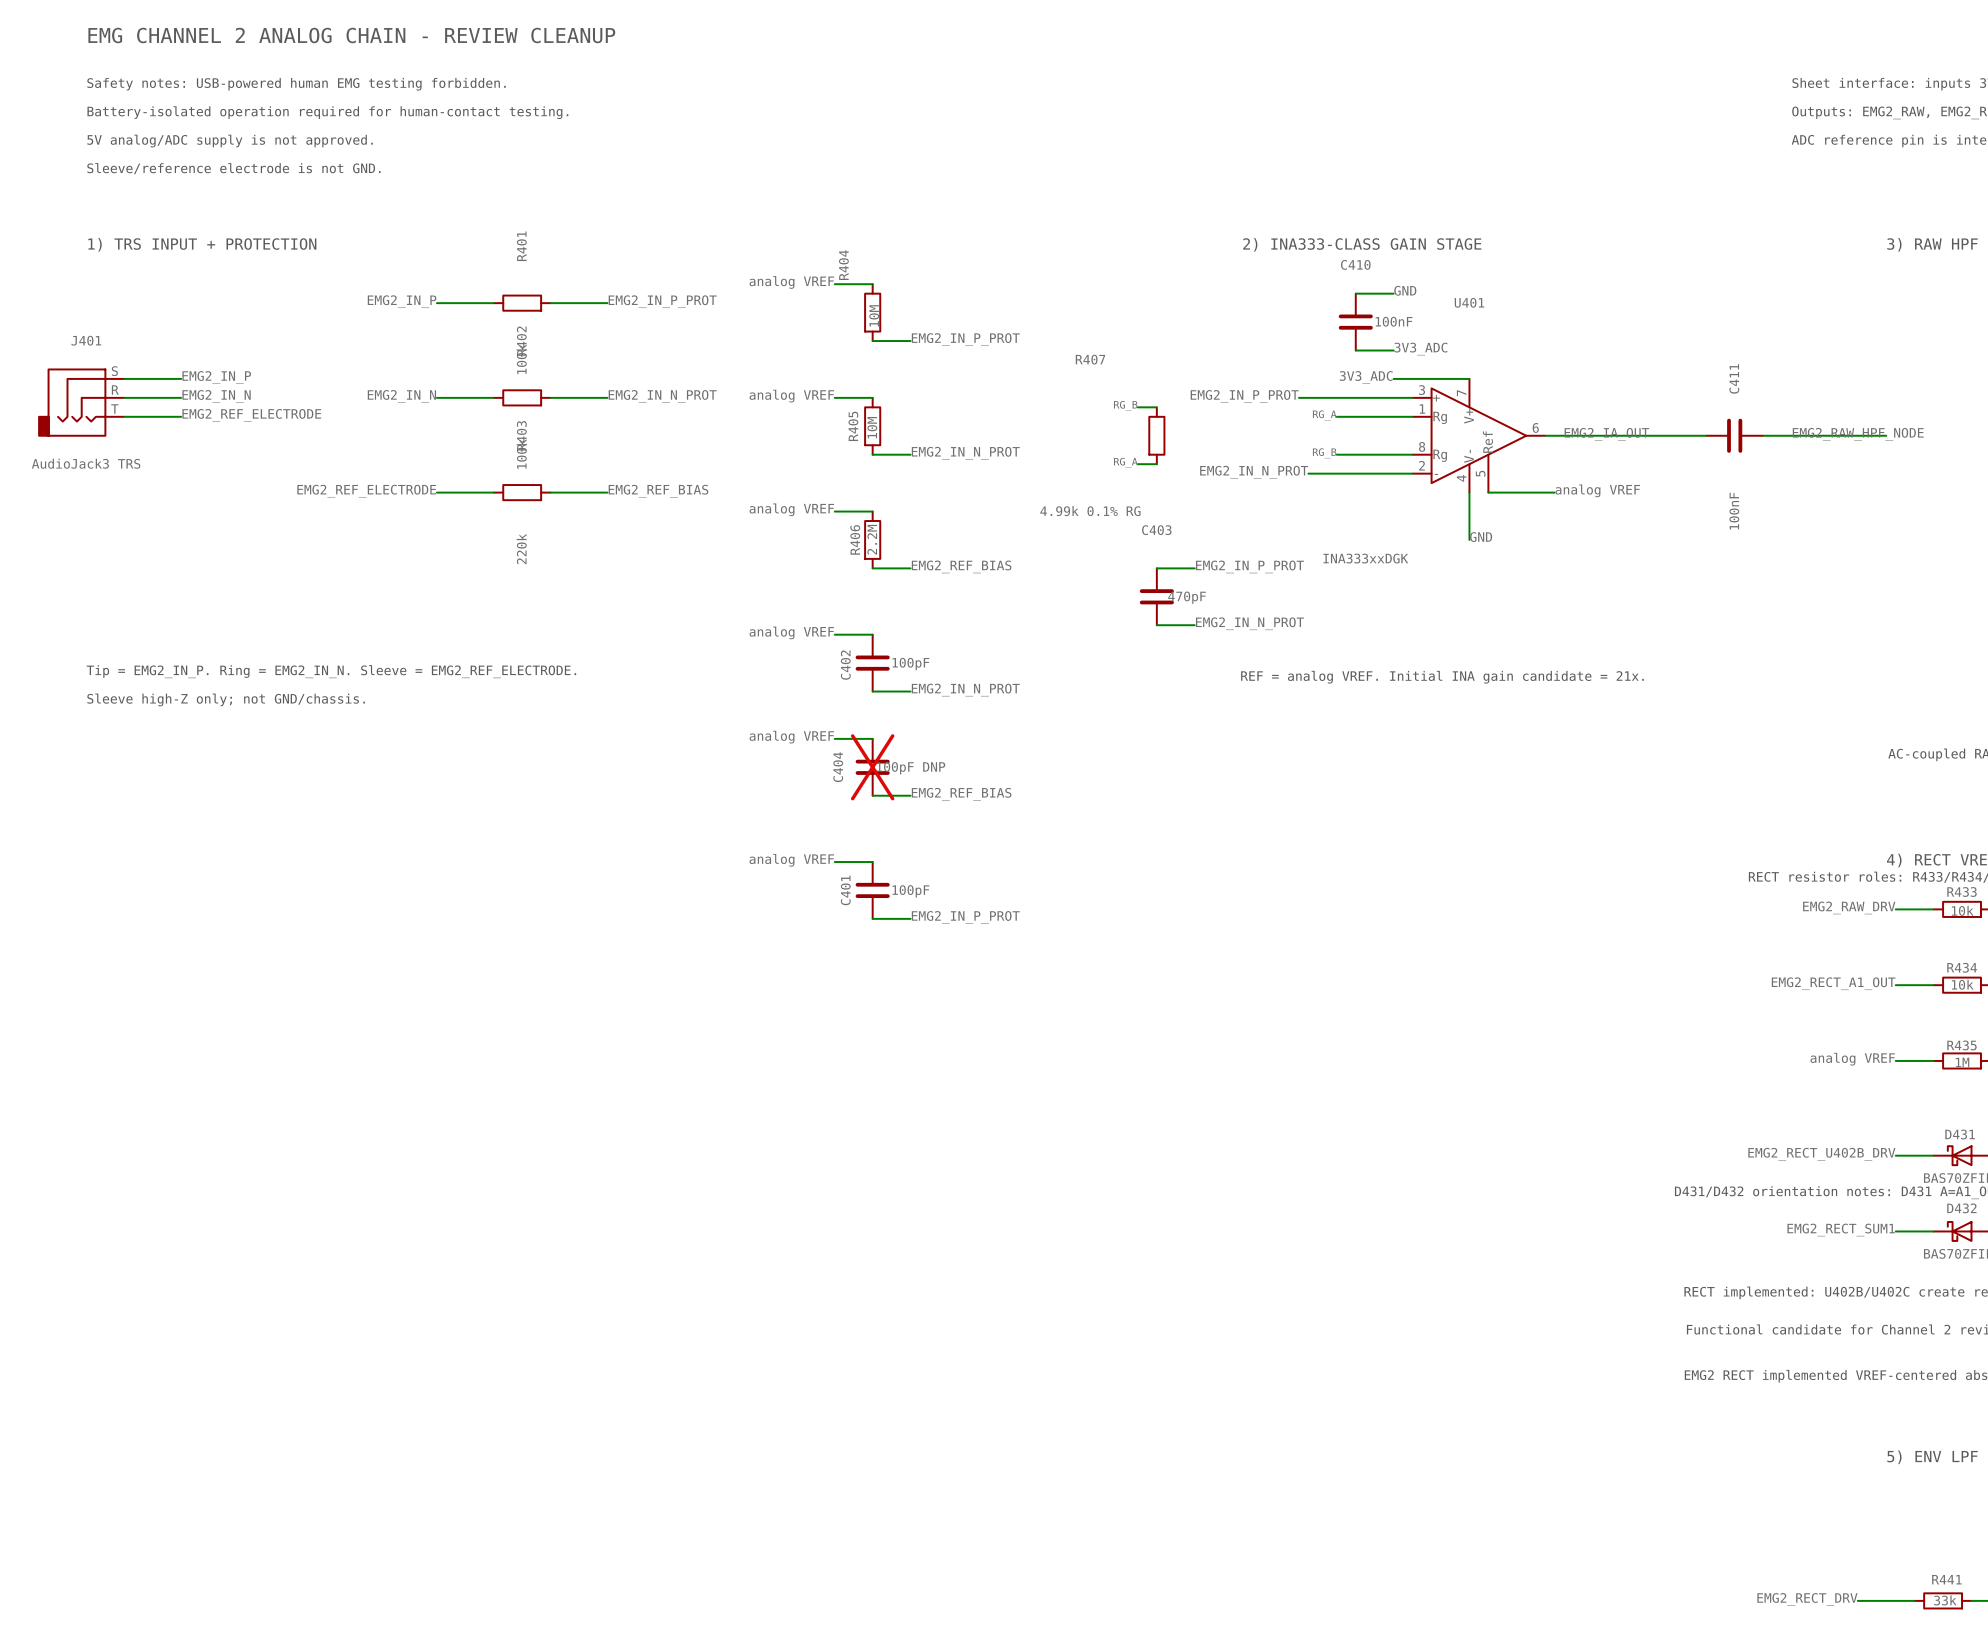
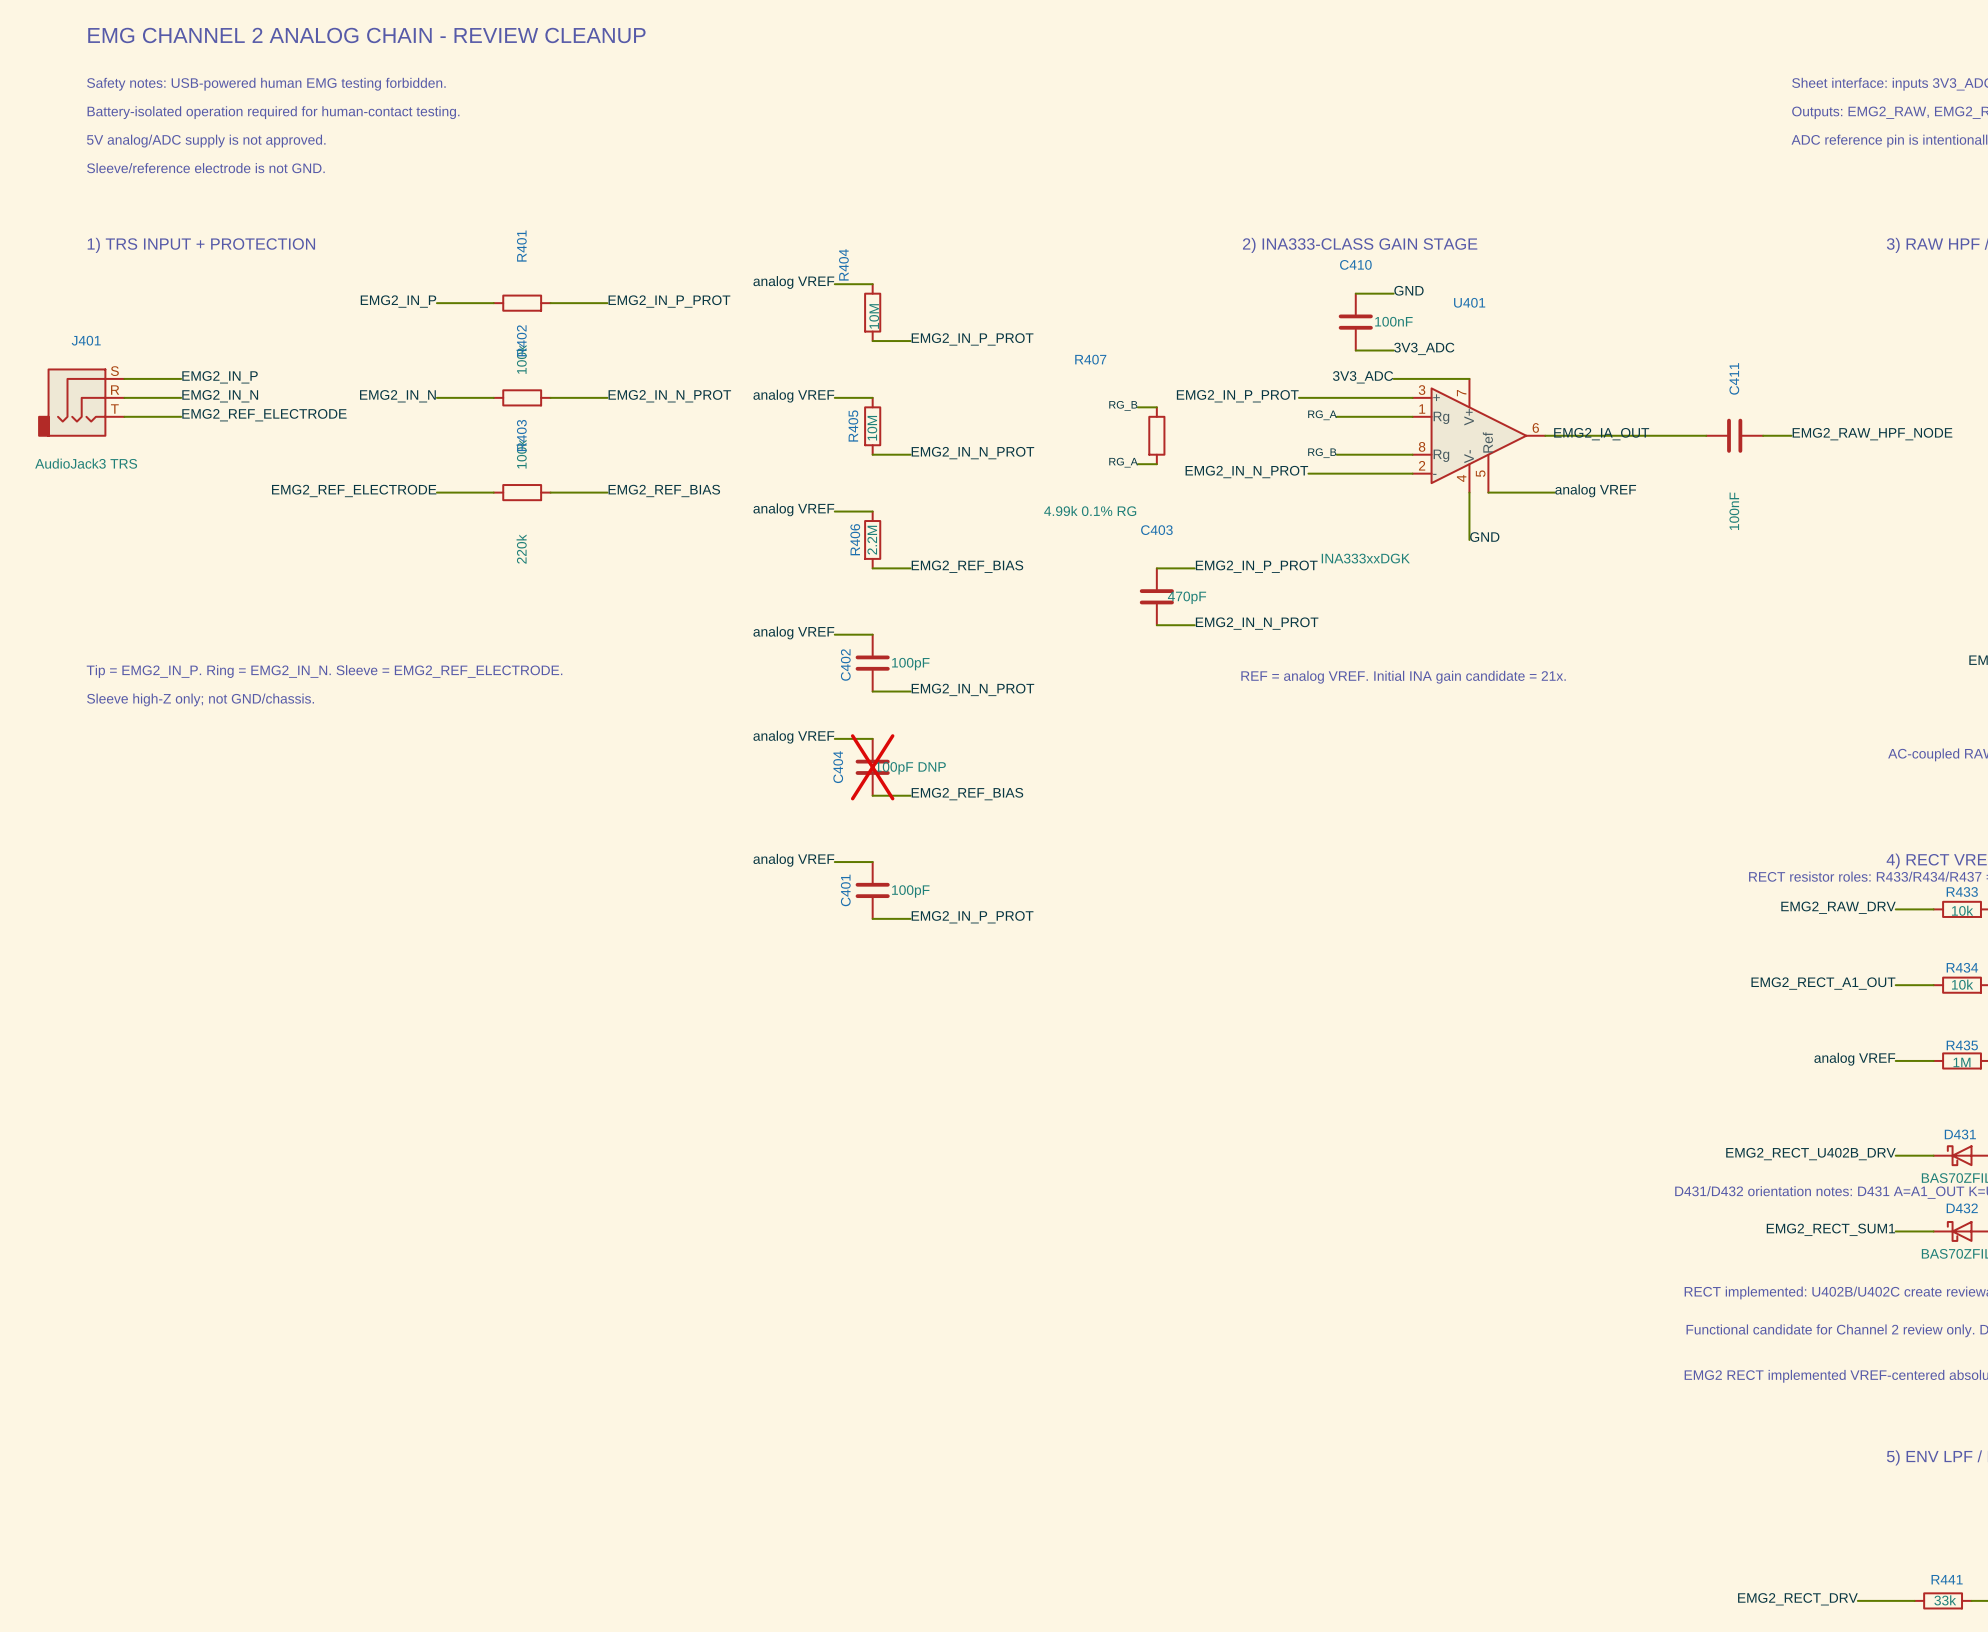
wire: (1791, 435) (1886, 435) -> none

